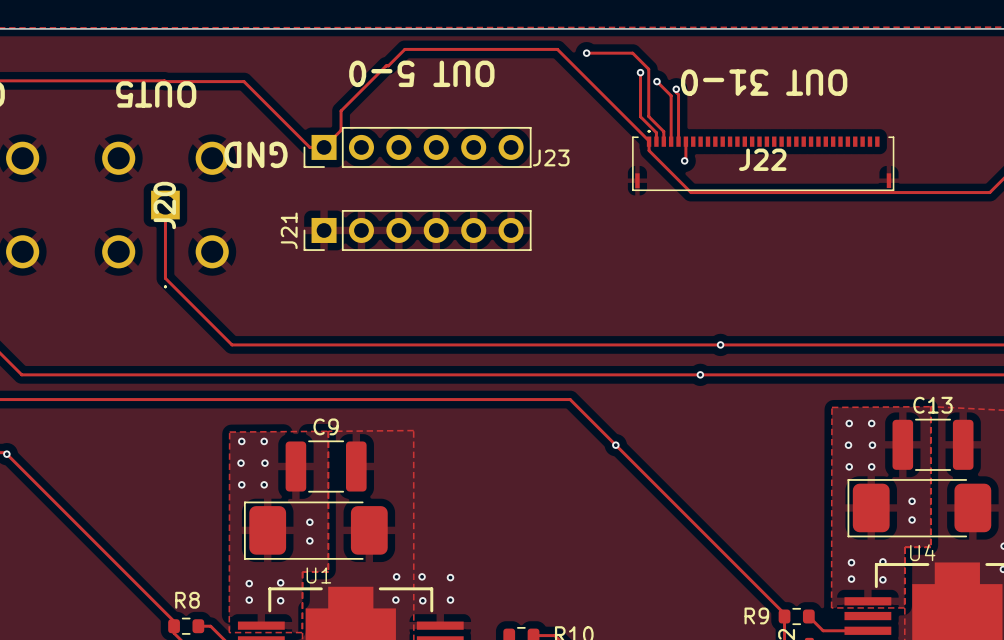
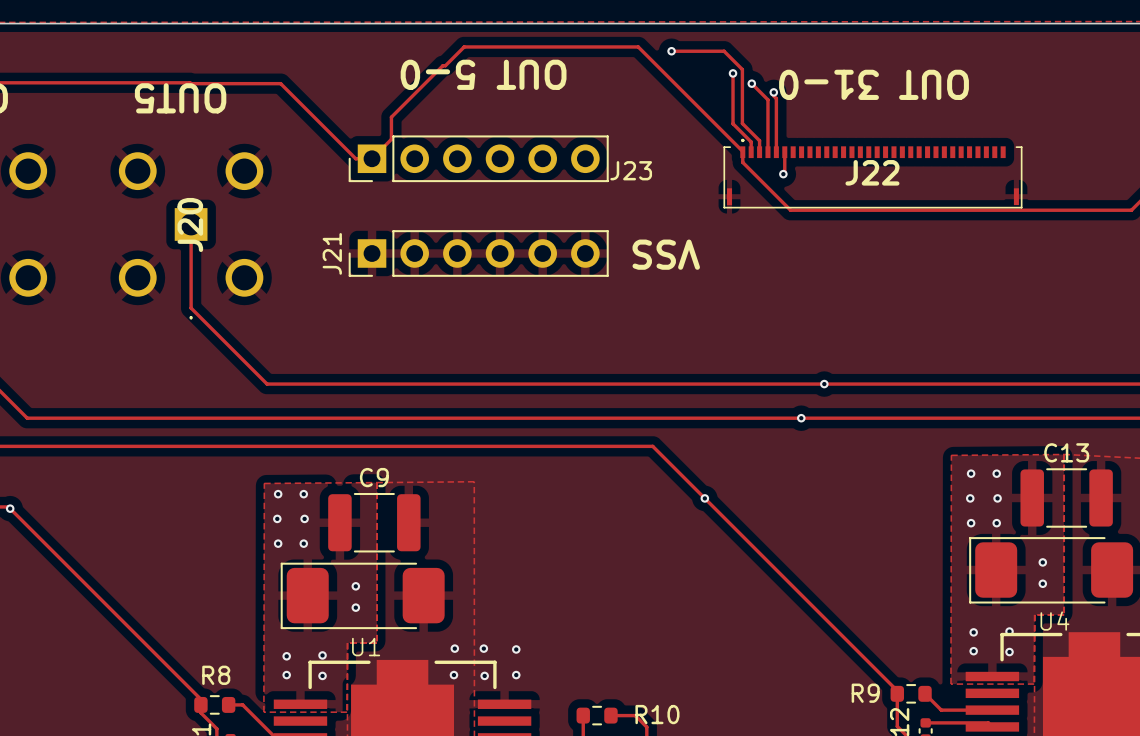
text: GND (255, 154) -> none
text: none -> VSS (666, 254)

